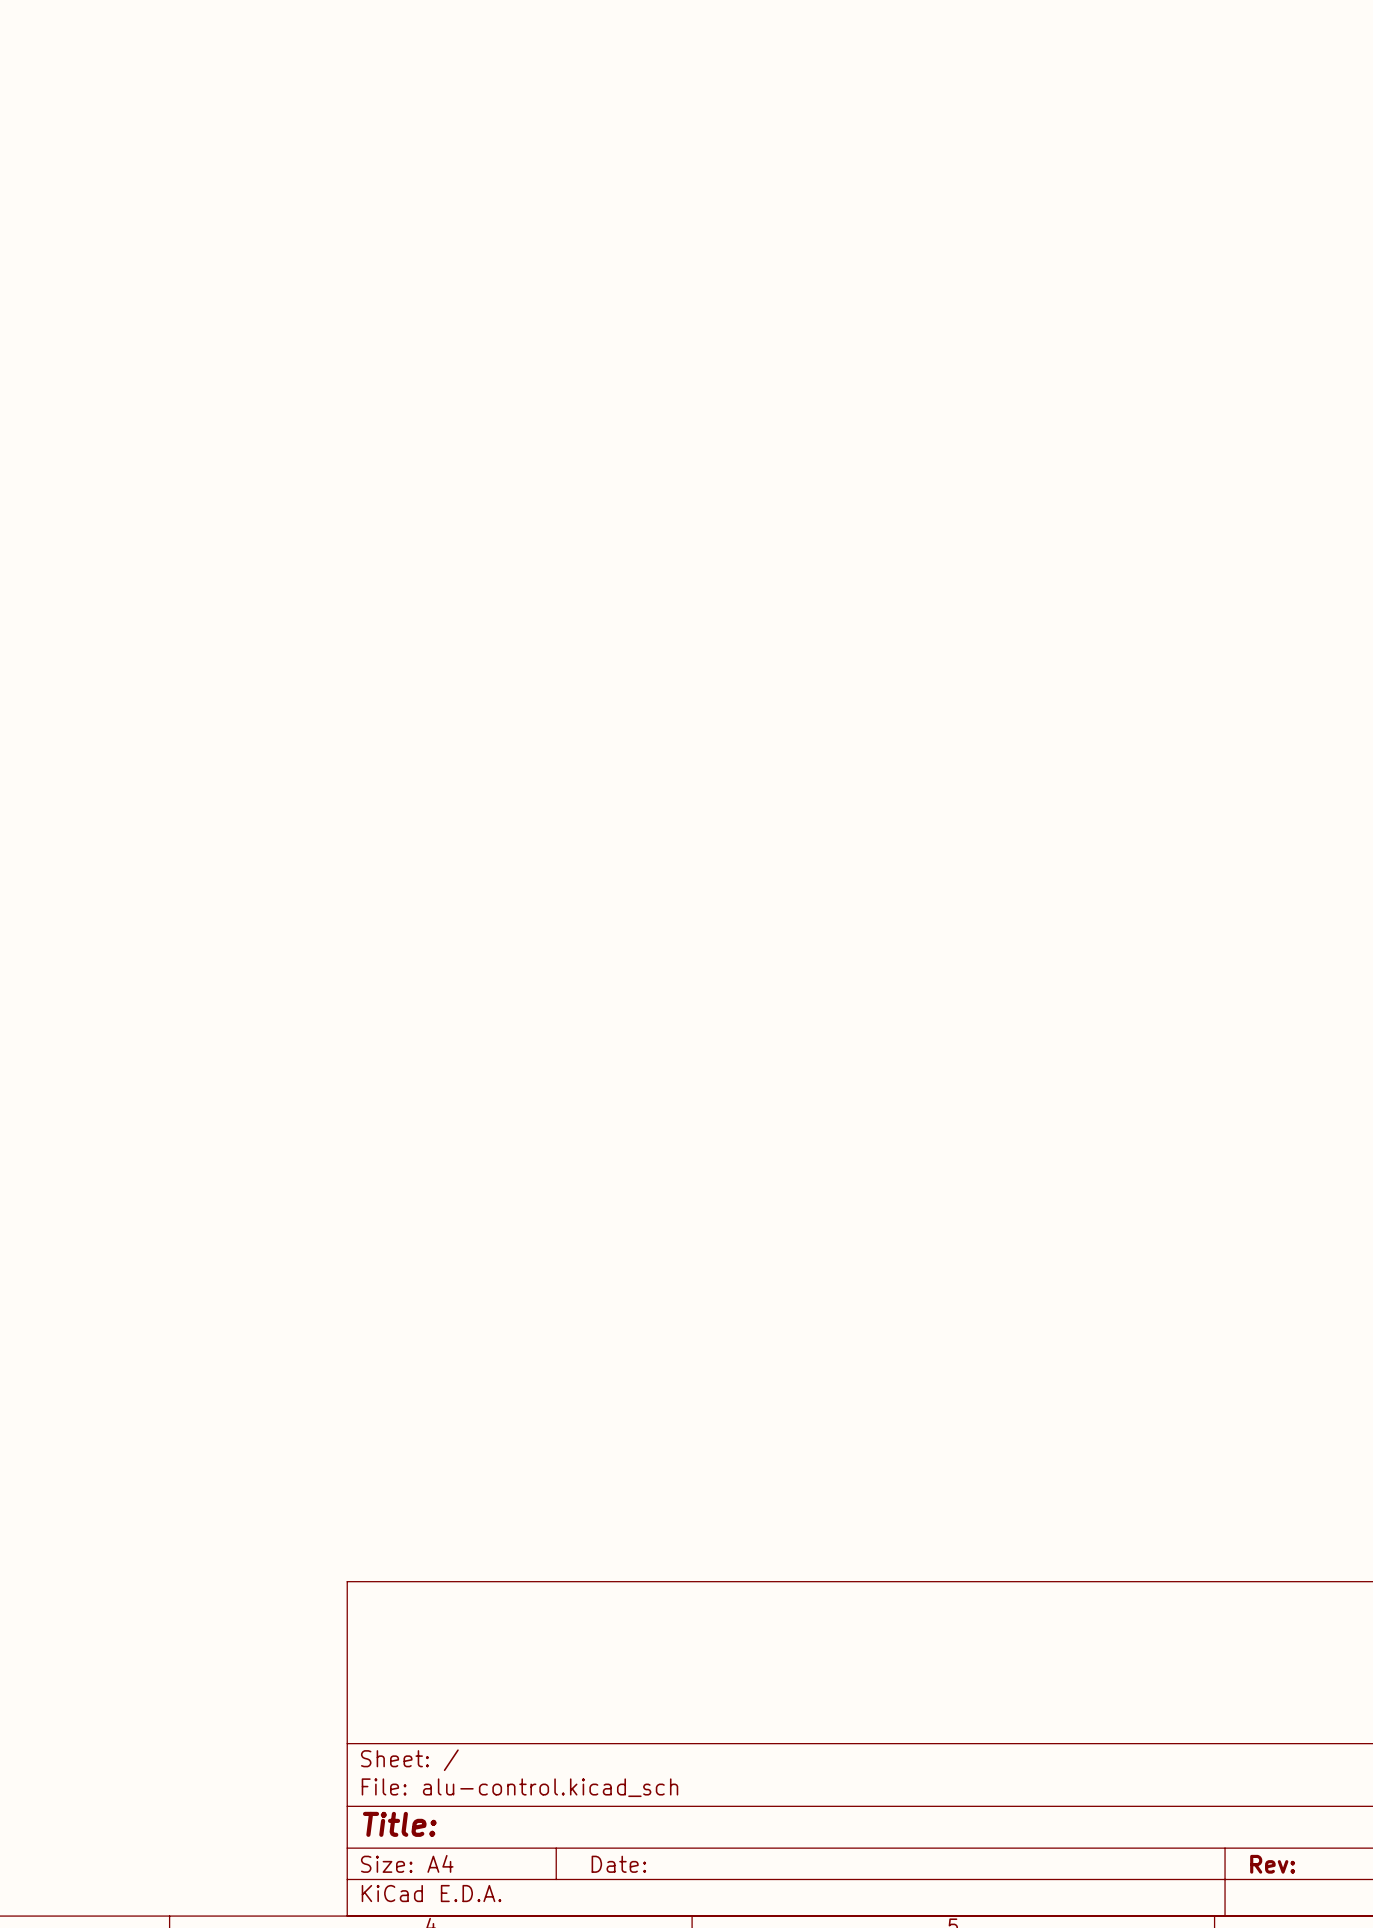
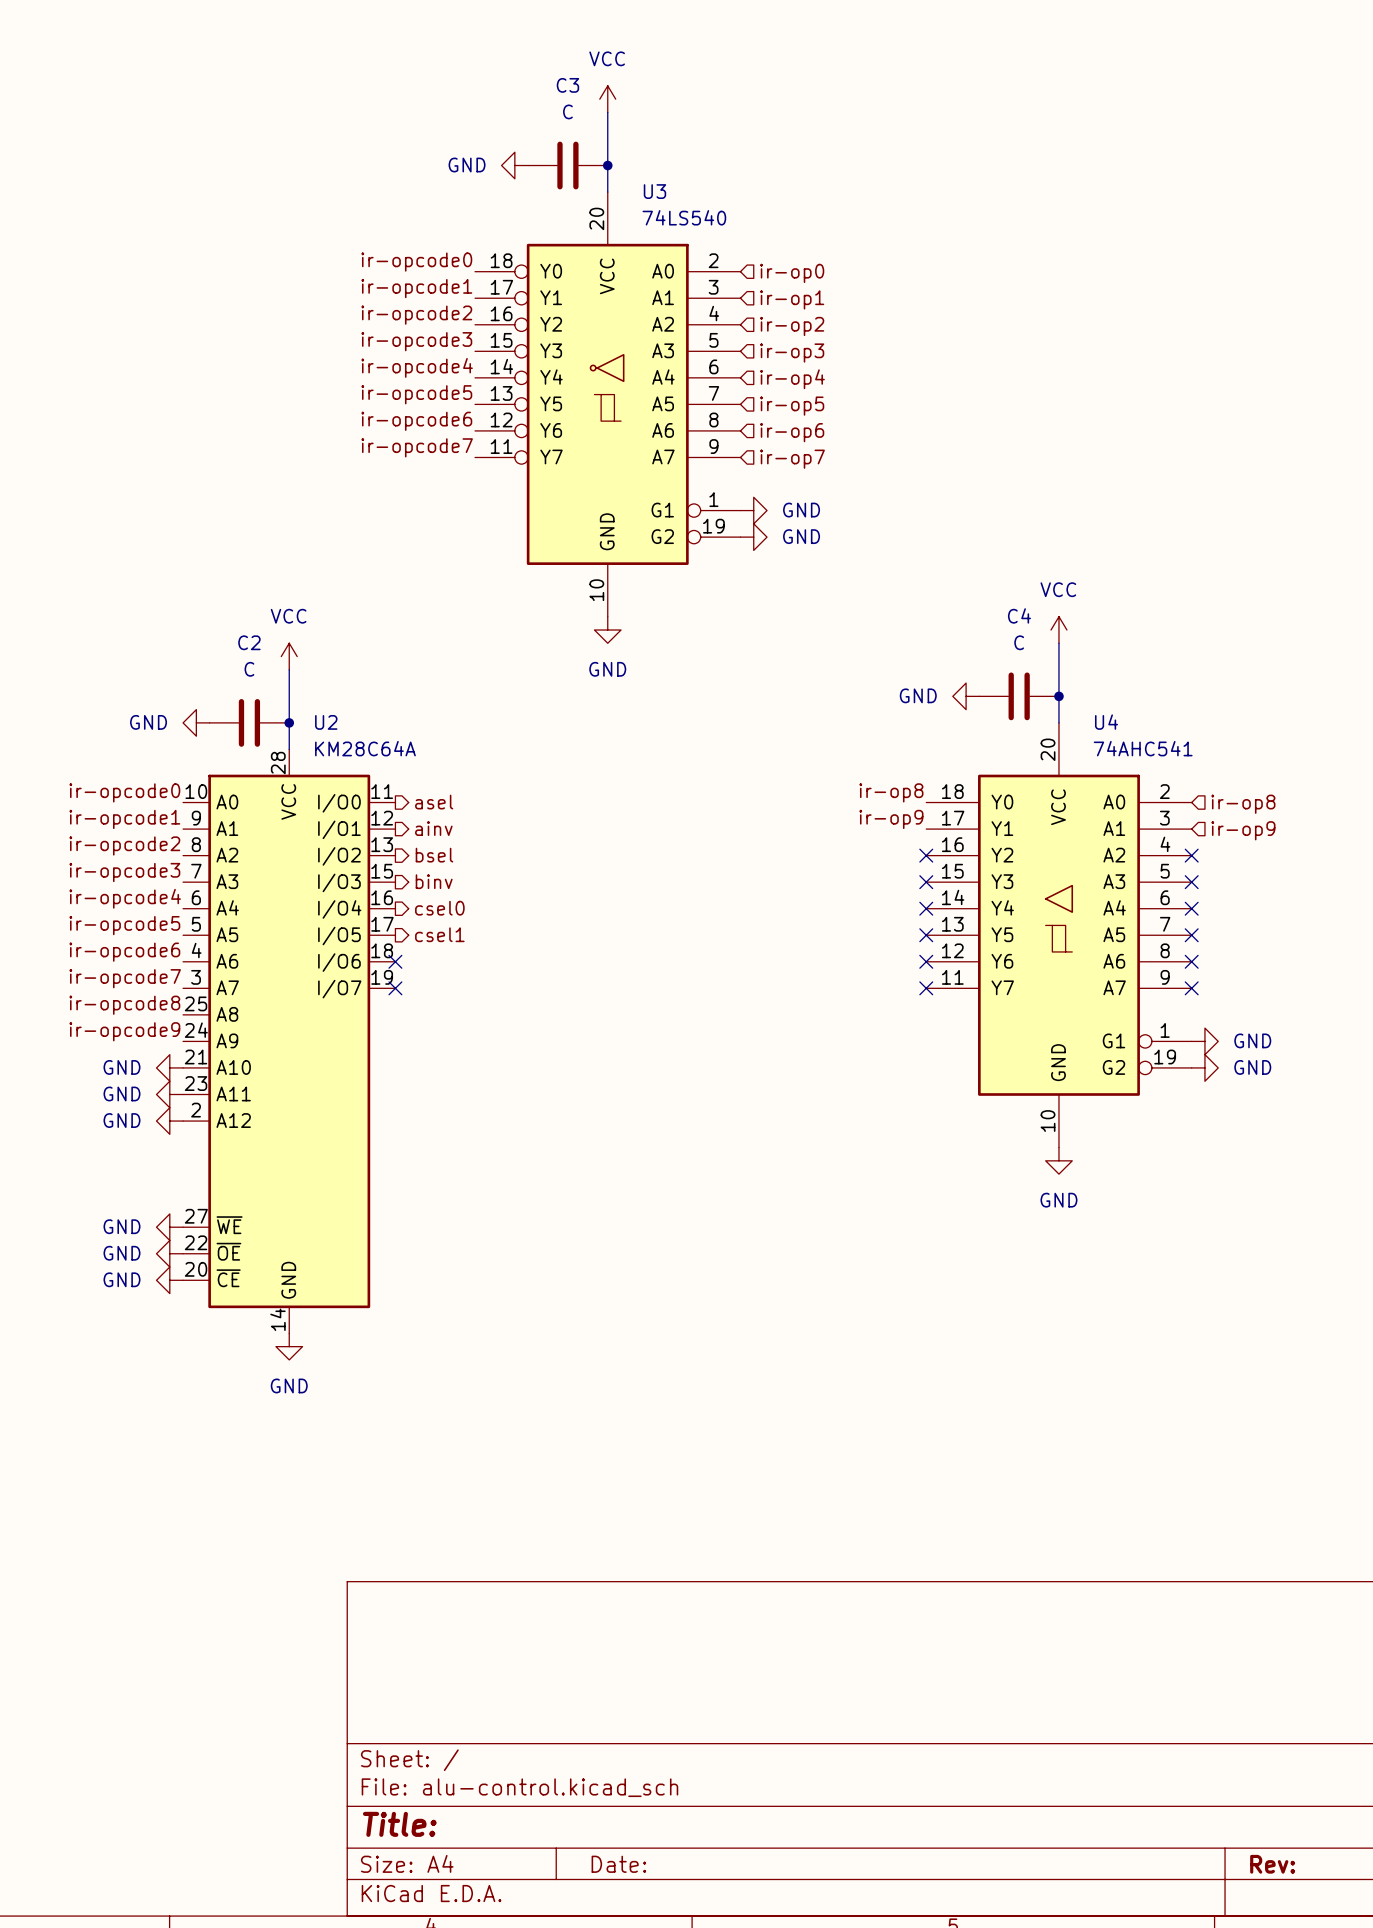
power symbol: none -> VCC (607, 99)
wire: none -> (607, 112) (607, 192)
power symbol: none -> GND (514, 165)
C3: none -> C (567, 165)
junction: none -> (607, 165)
label: none -> ir-opcode0 (416, 262)
hierarchical label: none -> ir-op0 (792, 273)
label: none -> ir-opcode1 (416, 288)
hierarchical label: none -> ir-op1 (792, 299)
label: none -> ir-opcode2 (416, 315)
hierarchical label: none -> ir-op2 (792, 326)
label: none -> ir-opcode3 (416, 341)
hierarchical label: none -> ir-op3 (792, 353)
label: none -> ir-opcode4 (417, 367)
hierarchical label: none -> ir-op4 (792, 379)
label: none -> ir-opcode5 (416, 394)
U3: none -> 74LS540 (607, 404)
hierarchical label: none -> ir-op5 (792, 406)
label: none -> ir-opcode6 (416, 421)
hierarchical label: none -> ir-op6 (792, 432)
label: none -> ir-opcode7 (417, 447)
hierarchical label: none -> ir-op7 (792, 459)
power symbol: none -> GND (753, 510)
power symbol: none -> GND (753, 537)
power symbol: none -> GND (607, 630)
power symbol: none -> VCC (1058, 630)
wire: none -> (1058, 643) (1058, 722)
power symbol: none -> VCC (289, 656)
wire: none -> (289, 669) (289, 749)
power symbol: none -> GND (966, 696)
C4: none -> C (1019, 696)
junction: none -> (1058, 696)
power symbol: none -> GND (196, 722)
C2: none -> C (249, 722)
junction: none -> (289, 722)
label: none -> ir-opcode0 (124, 792)
label: none -> ir-op8 (891, 792)
hierarchical label: none -> asel (434, 802)
hierarchical label: none -> ir-op8 (1243, 804)
label: none -> ir-opcode1 (124, 819)
label: none -> ir-op9 (891, 819)
hierarchical label: none -> ainv (433, 828)
hierarchical label: none -> ir-op9 (1243, 830)
label: none -> ir-opcode2 (124, 845)
hierarchical label: none -> bsel (434, 855)
no-connect mark: none -> (926, 855)
no-connect mark: none -> (1191, 855)
label: none -> ir-opcode3 (124, 872)
hierarchical label: none -> binv (434, 881)
no-connect mark: none -> (926, 882)
no-connect mark: none -> (1191, 882)
label: none -> ir-opcode4 (125, 898)
hierarchical label: none -> csel0 (439, 908)
no-connect mark: none -> (926, 908)
no-connect mark: none -> (1191, 908)
label: none -> ir-opcode5 (124, 925)
hierarchical label: none -> csel1 (439, 934)
no-connect mark: none -> (926, 935)
U4: none -> 74AHC541 (1058, 935)
no-connect mark: none -> (1191, 935)
label: none -> ir-opcode6 (124, 952)
no-connect mark: none -> (395, 961)
no-connect mark: none -> (926, 961)
no-connect mark: none -> (1191, 961)
label: none -> ir-opcode7 (125, 978)
no-connect mark: none -> (395, 988)
no-connect mark: none -> (926, 988)
no-connect mark: none -> (1191, 988)
label: none -> ir-opcode8 (124, 1005)
label: none -> ir-opcode9 (124, 1031)
U2: none -> KM28C64A (289, 1041)
power symbol: none -> GND (1204, 1041)
power symbol: none -> GND (169, 1067)
power symbol: none -> GND (1204, 1067)
power symbol: none -> GND (169, 1094)
power symbol: none -> GND (169, 1121)
power symbol: none -> GND (1058, 1160)
power symbol: none -> GND (169, 1227)
power symbol: none -> GND (169, 1253)
power symbol: none -> GND (169, 1280)
power symbol: none -> GND (289, 1346)

